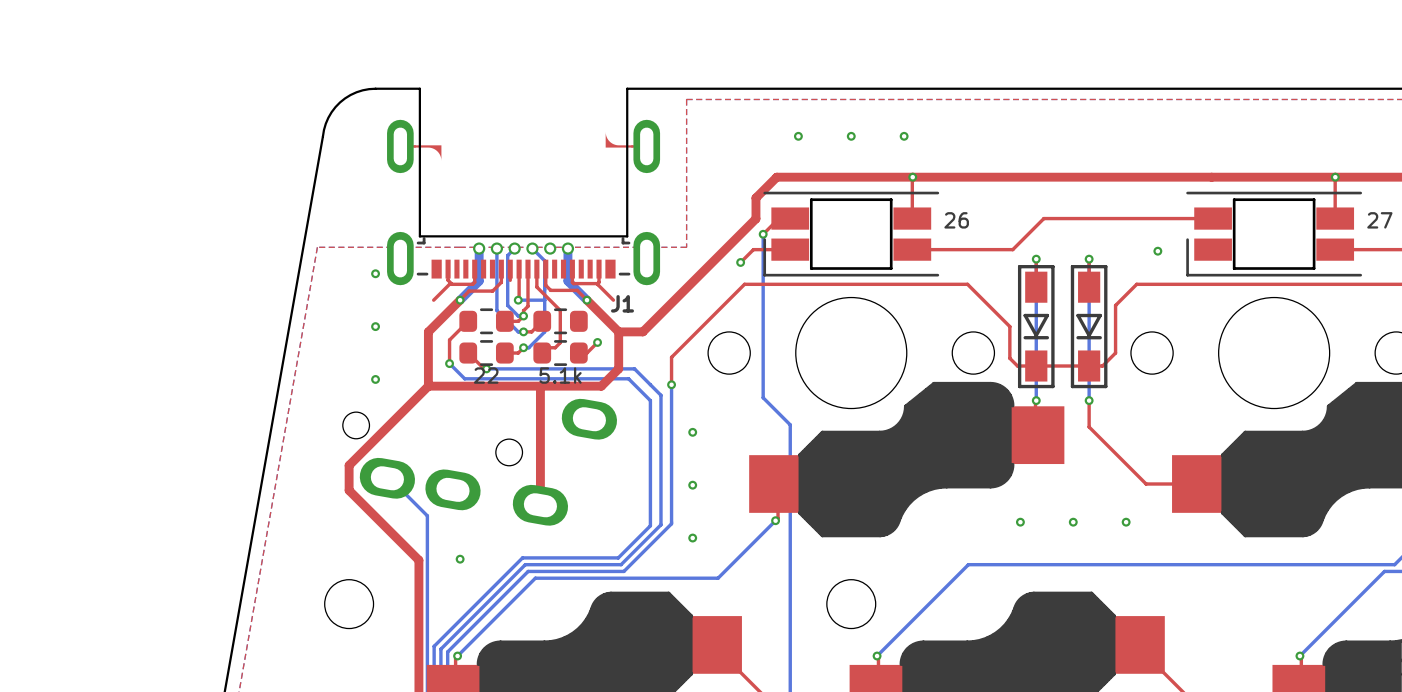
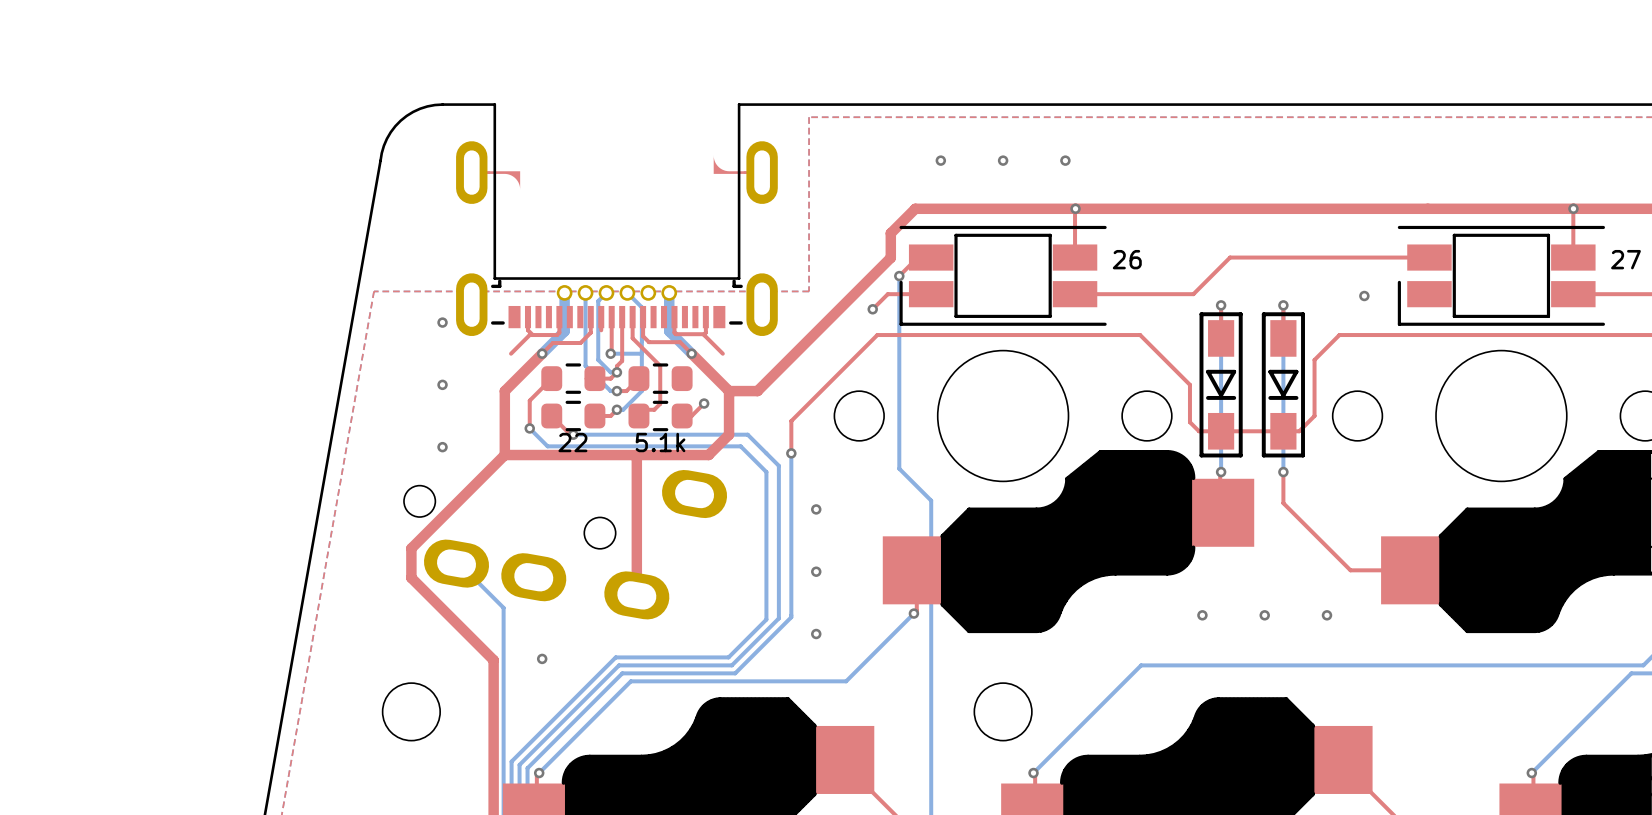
J1: (523, 186) -> none
part: none -> (616, 219)

